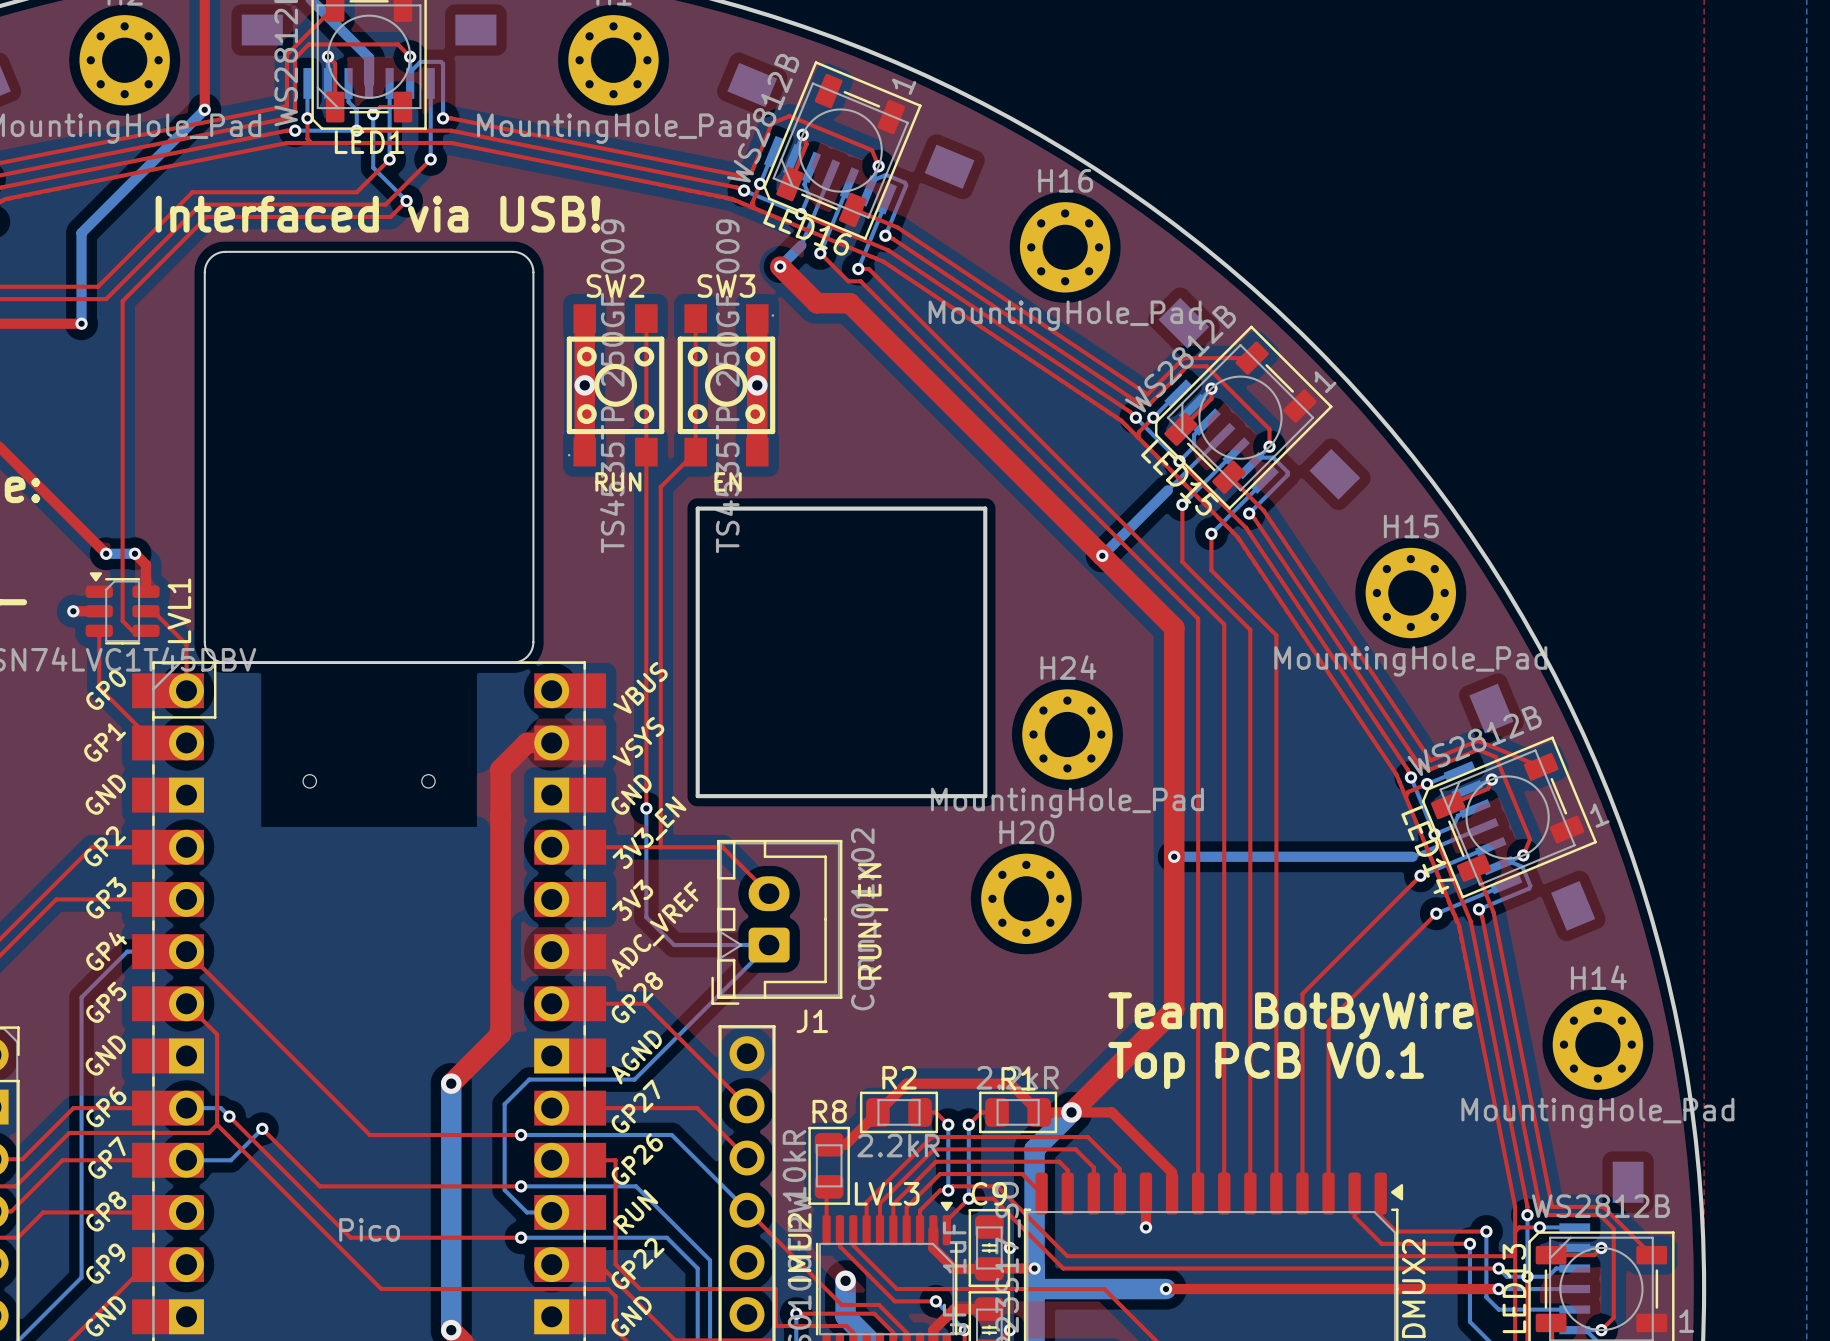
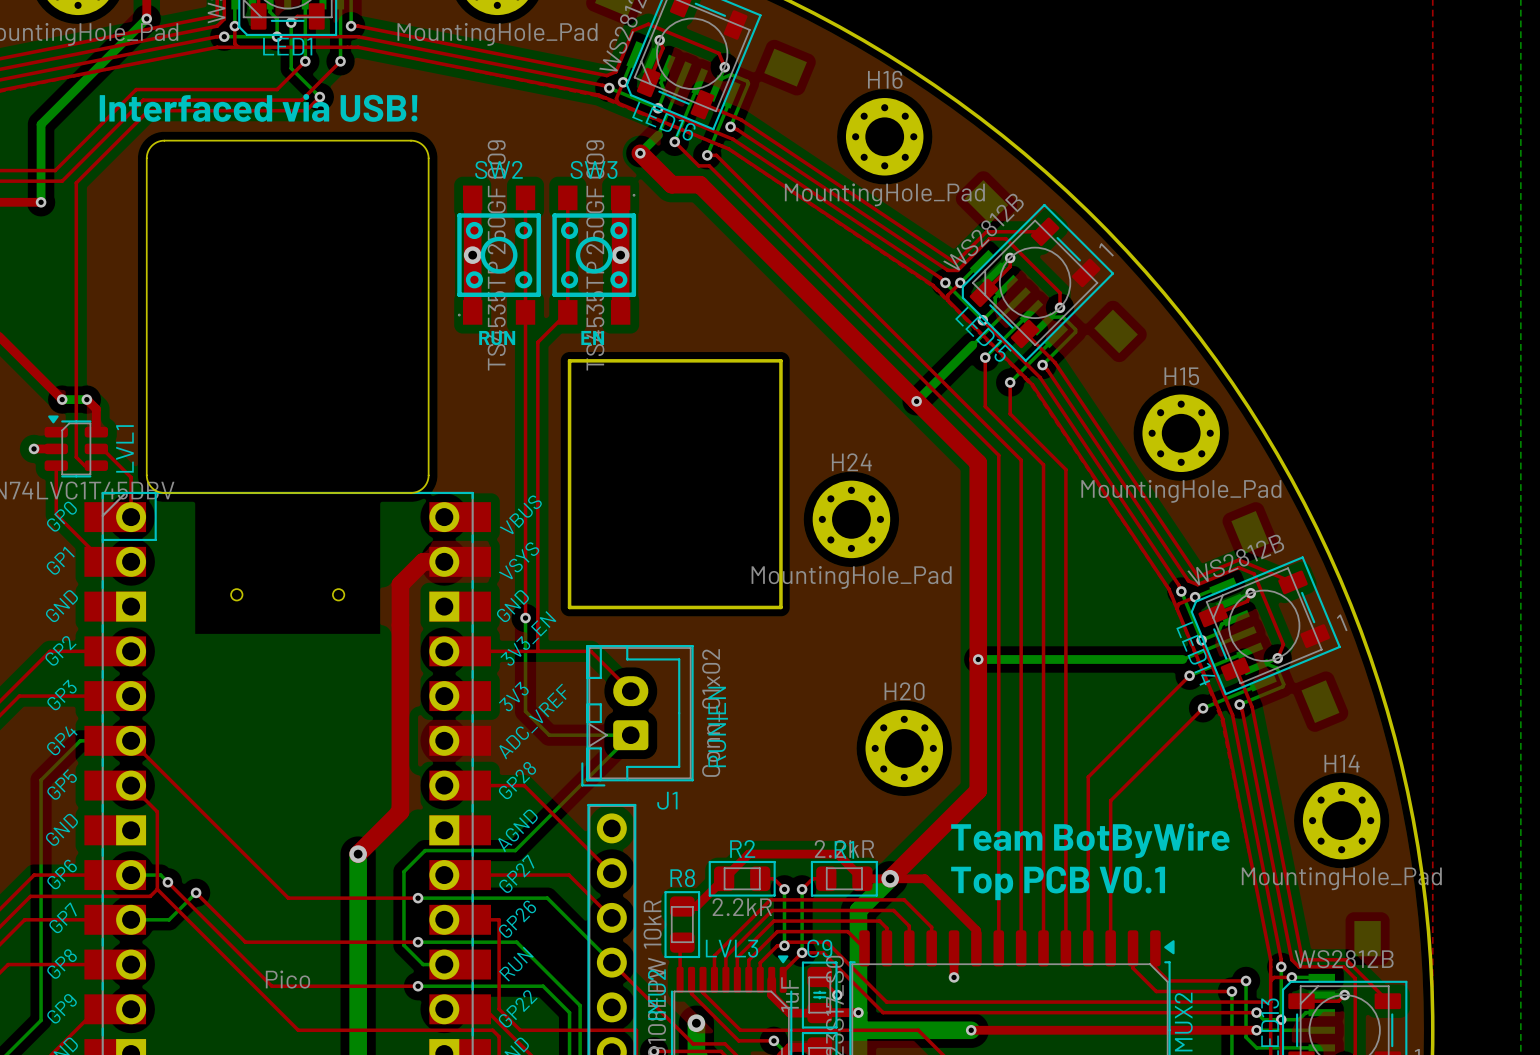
board edge: (944, 508) (985, 508) (985, 796) (944, 796) -> (780, 360) (780, 607)
H24 position: (1067, 734) -> (851, 519)
H20 position: (1026, 898) -> (904, 748)
text position: Team BotByWire (1291, 1015) -> Team BotByWire (1090, 840)
text position: Top PCB V0.1 (1266, 1065) -> Top PCB V0.1 (1058, 883)

